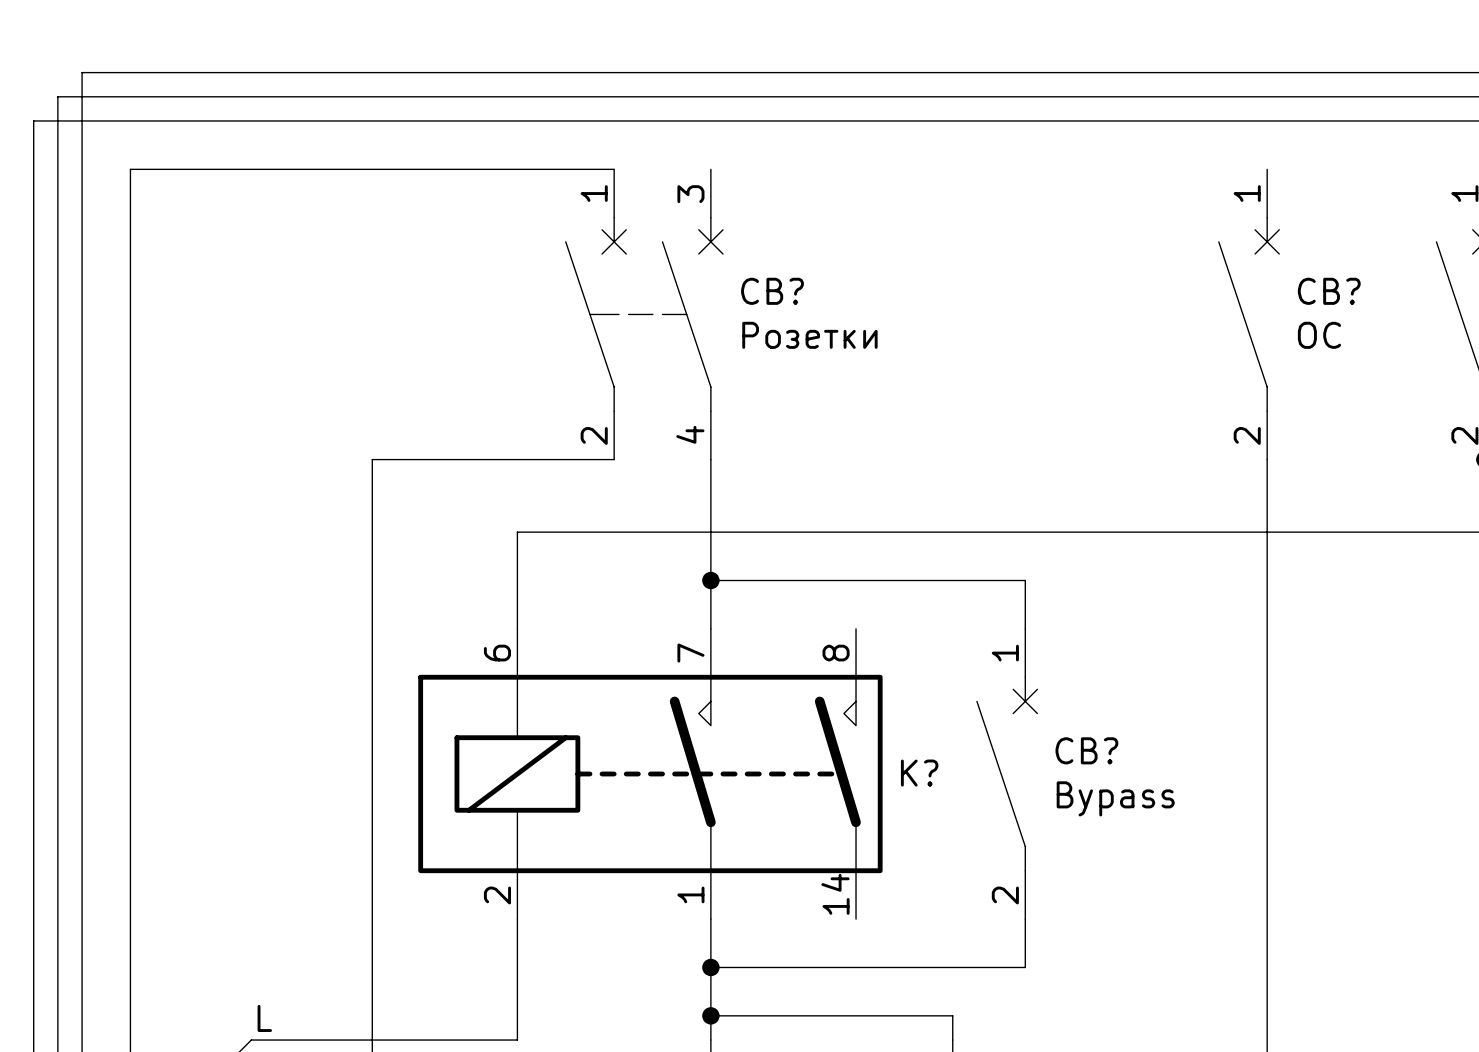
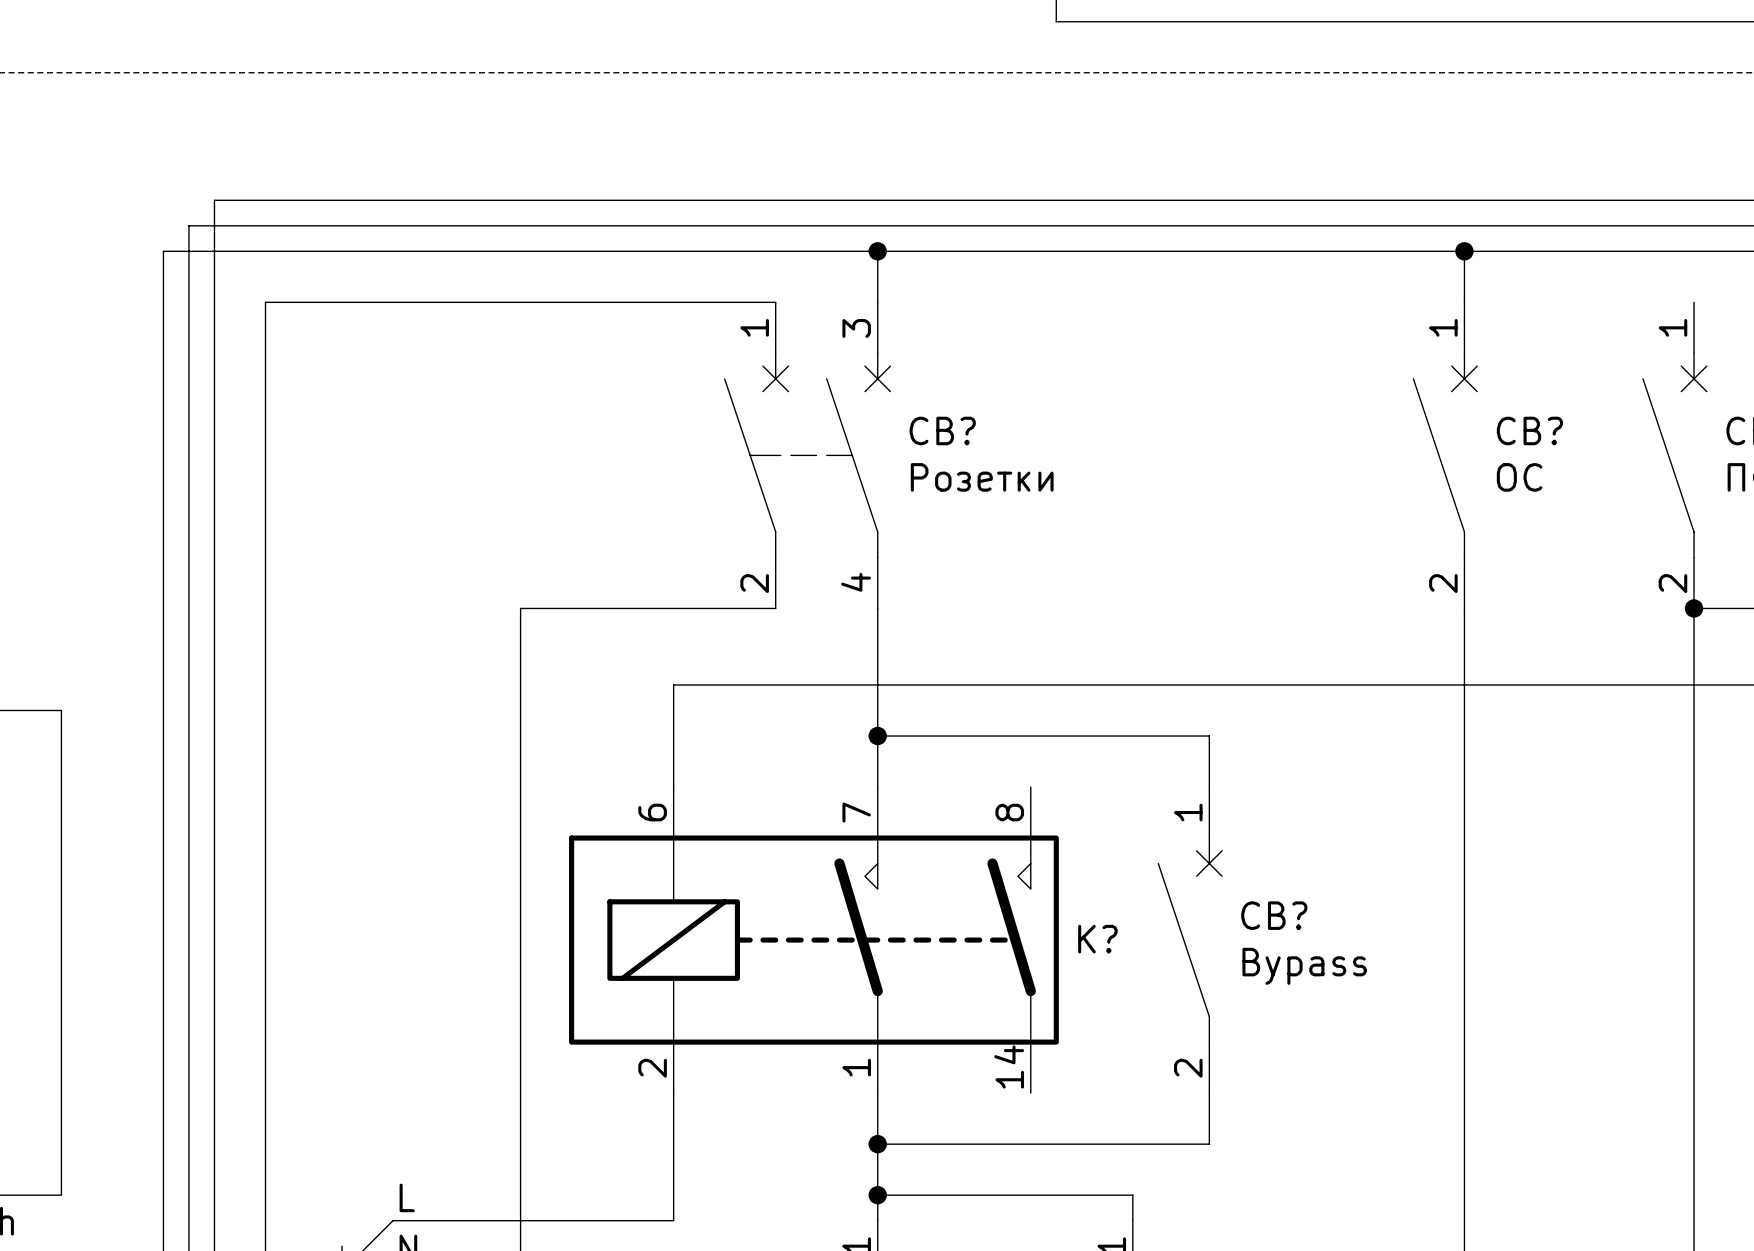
wire: none -> (877, 251) (877, 302)
junction: none -> (877, 251)
wire: none -> (1464, 251) (1464, 302)
junction: none -> (1464, 251)

